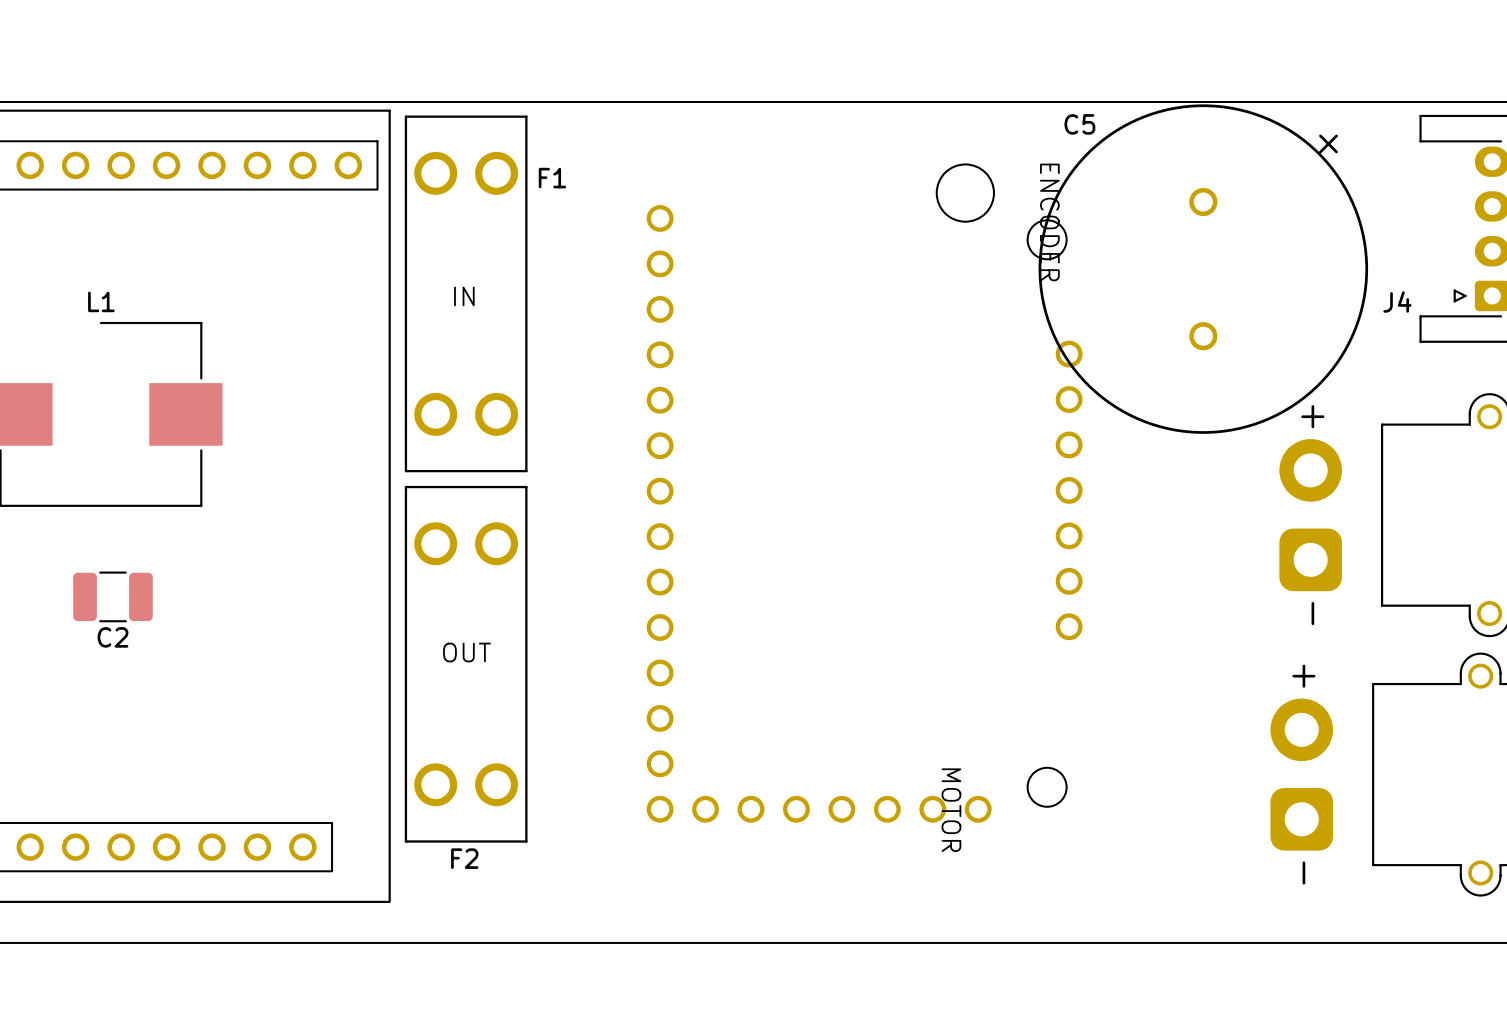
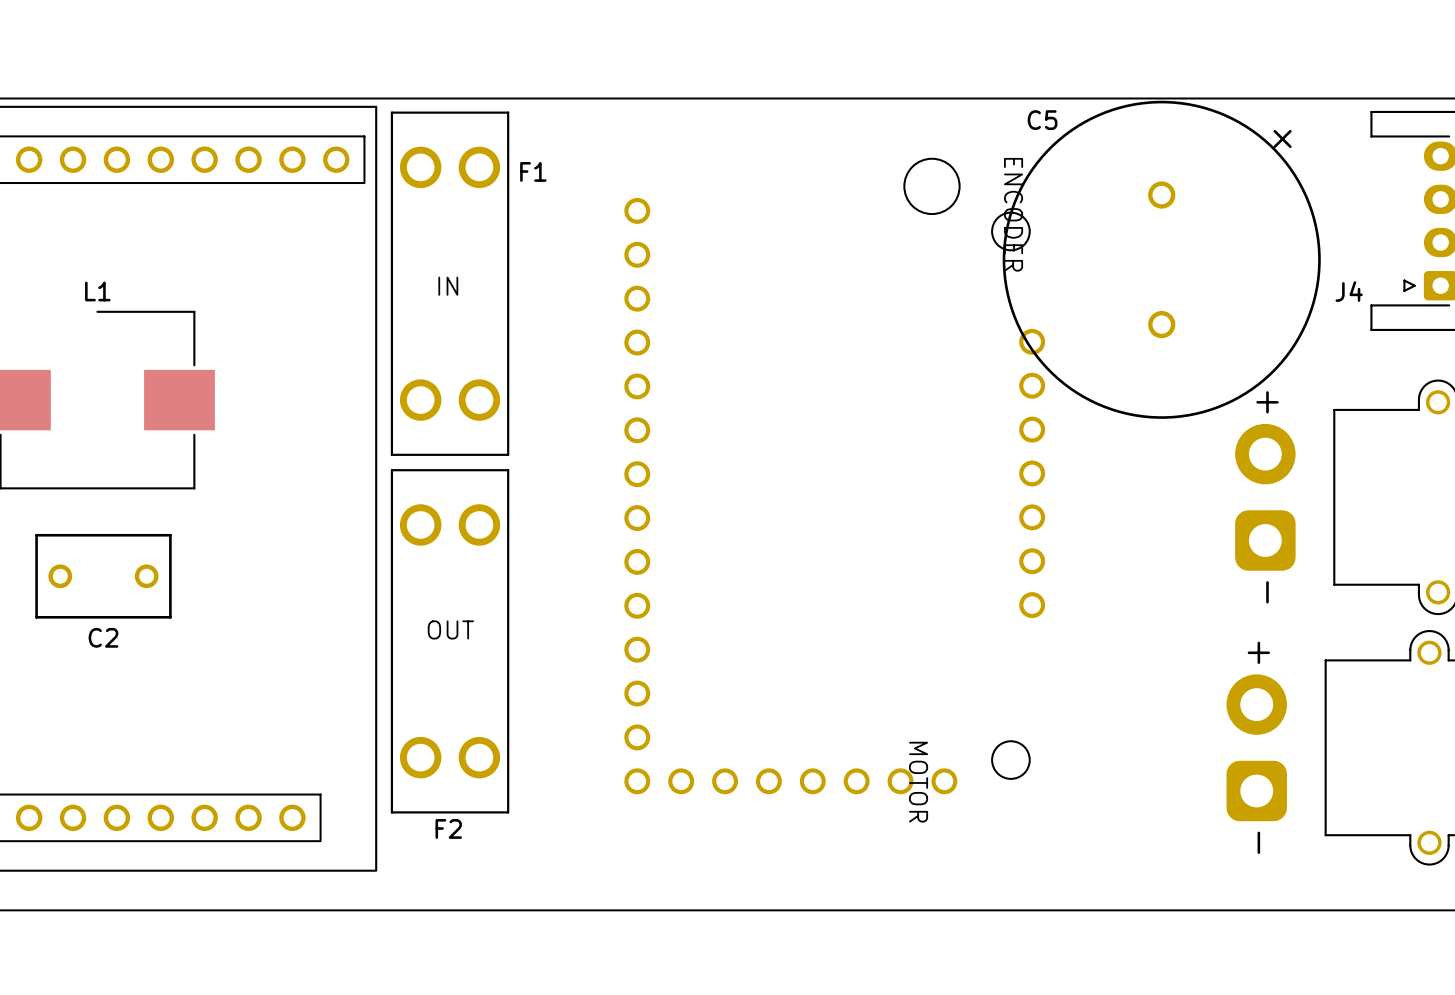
C2 footprint: [73, 571, 153, 623] -> [35, 533, 172, 619]

